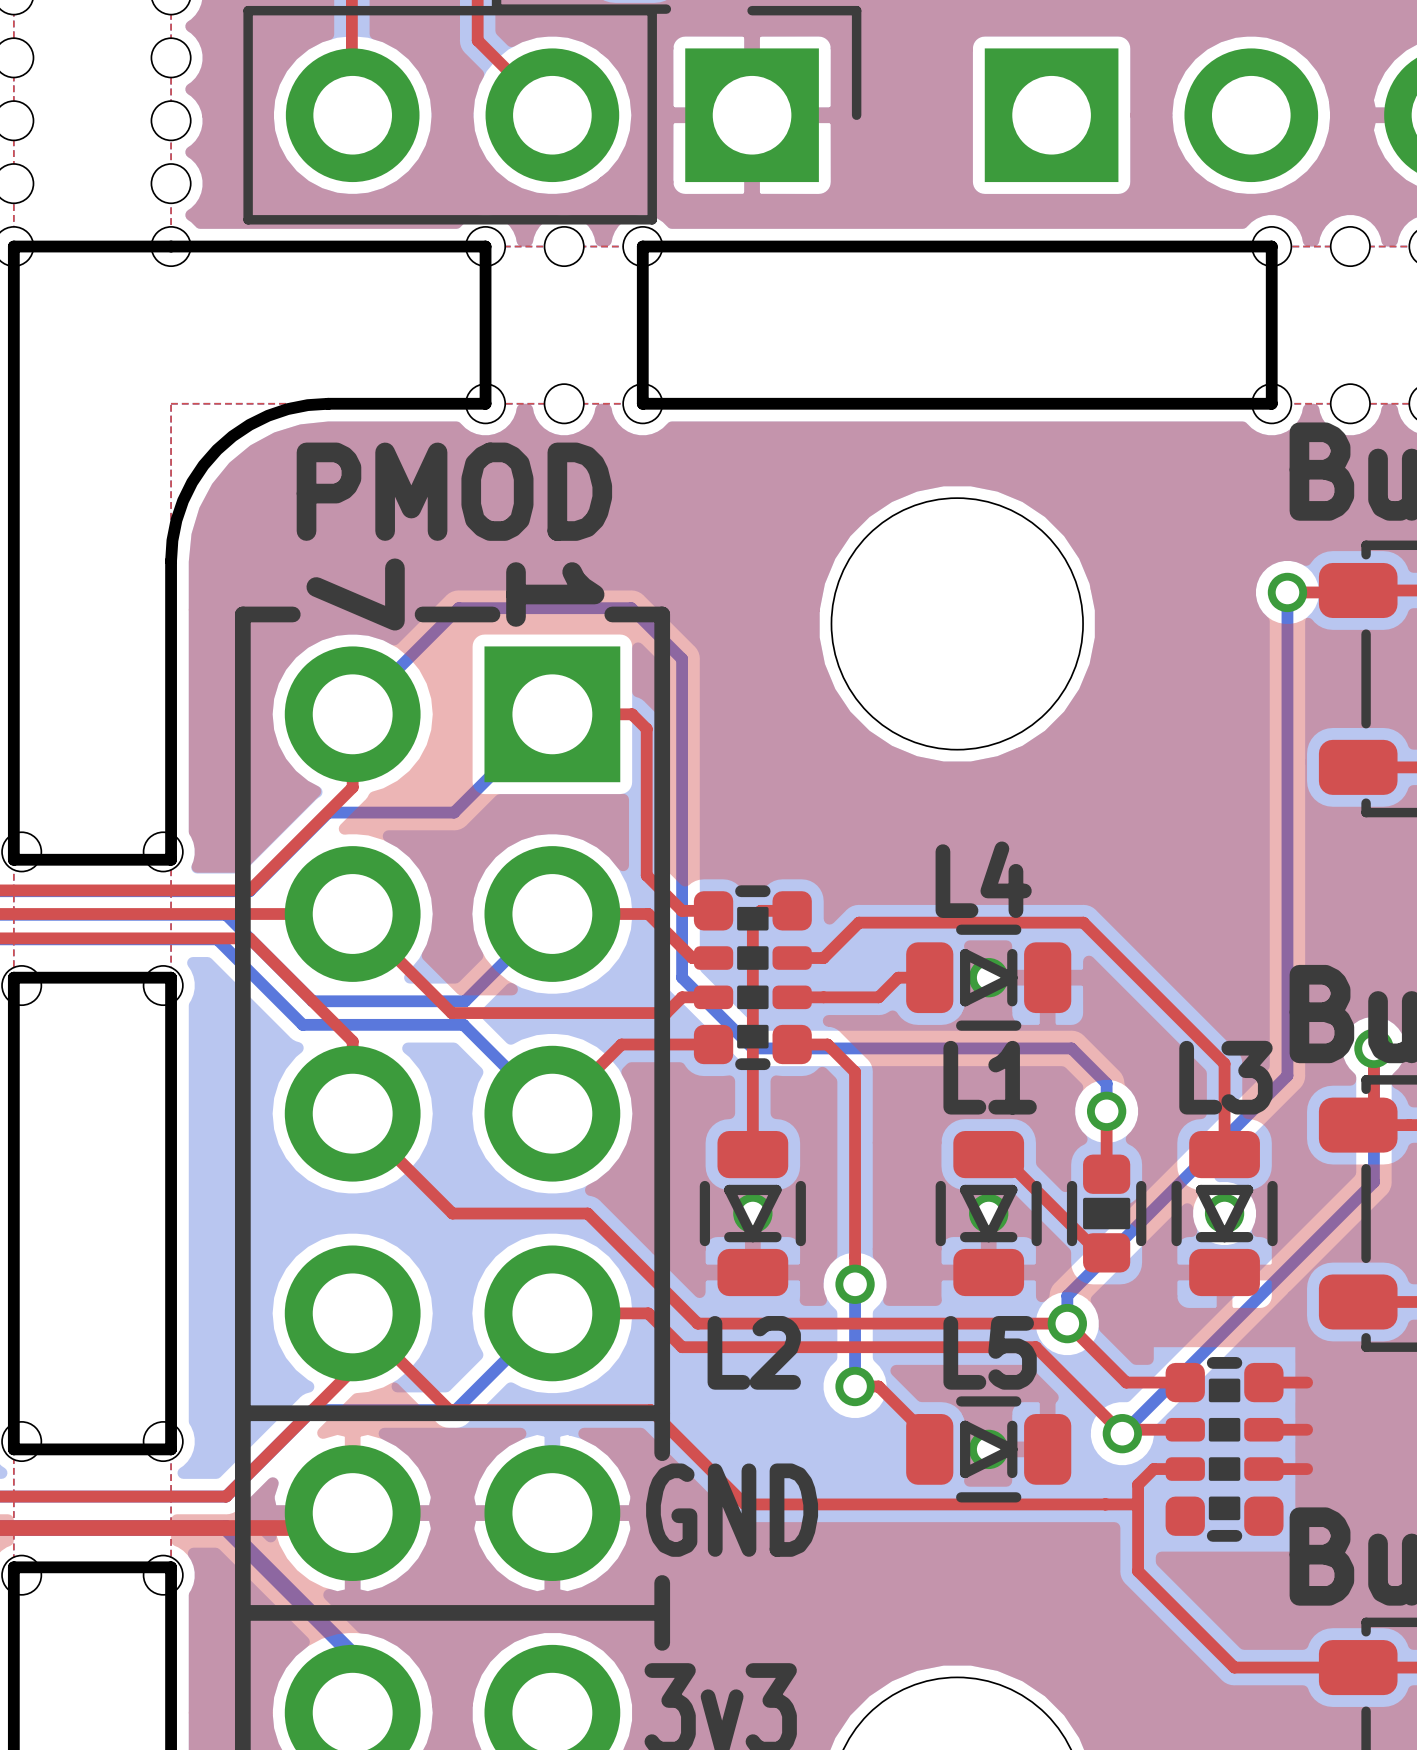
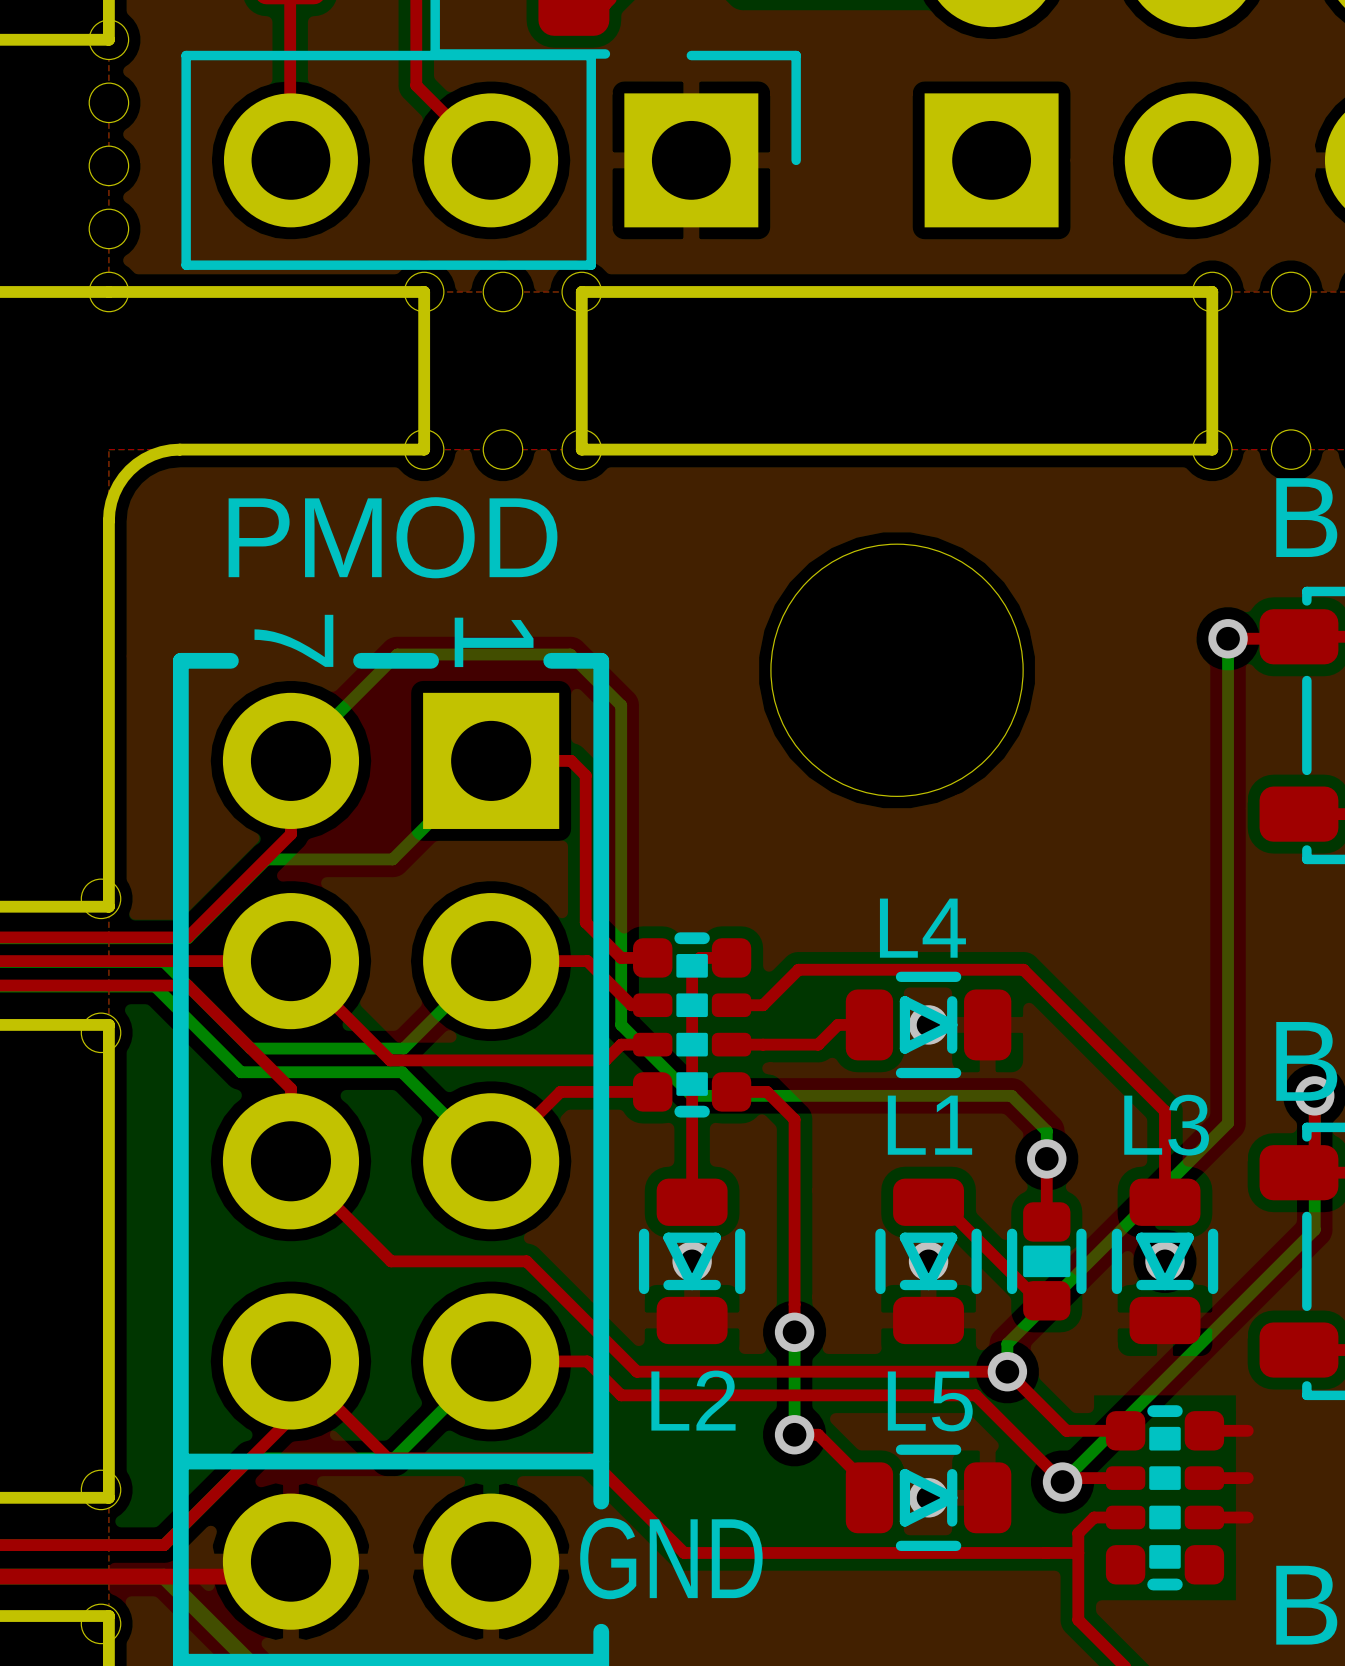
board edge: (328, 403) (287, 409) (268, 415) (232, 436) (217, 449) (192, 482) (183, 500) (176, 520) (171, 561) -> (266, 449) (170, 450) (152, 455) (129, 470) (118, 485) (109, 511) (108, 607)

